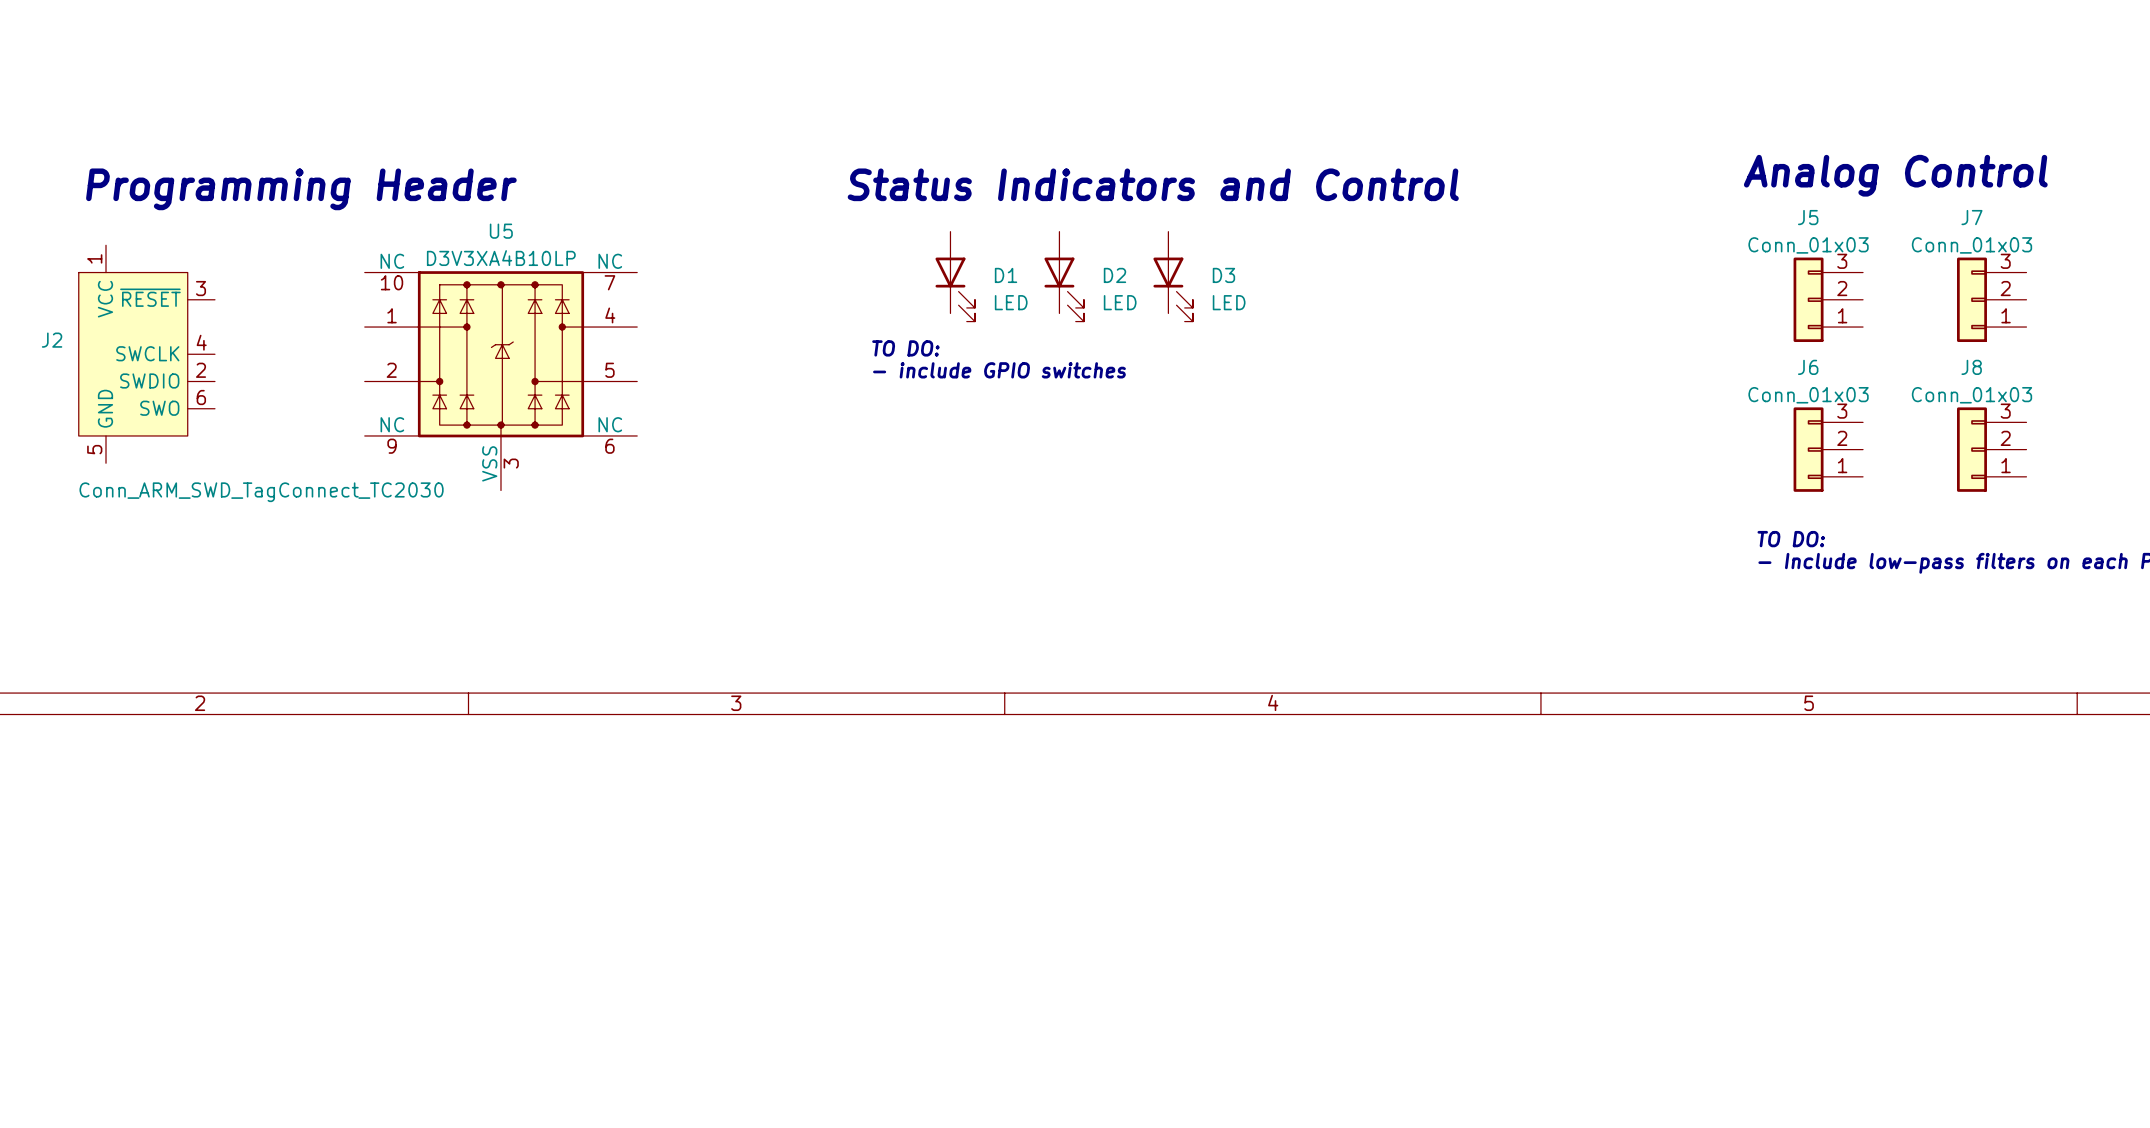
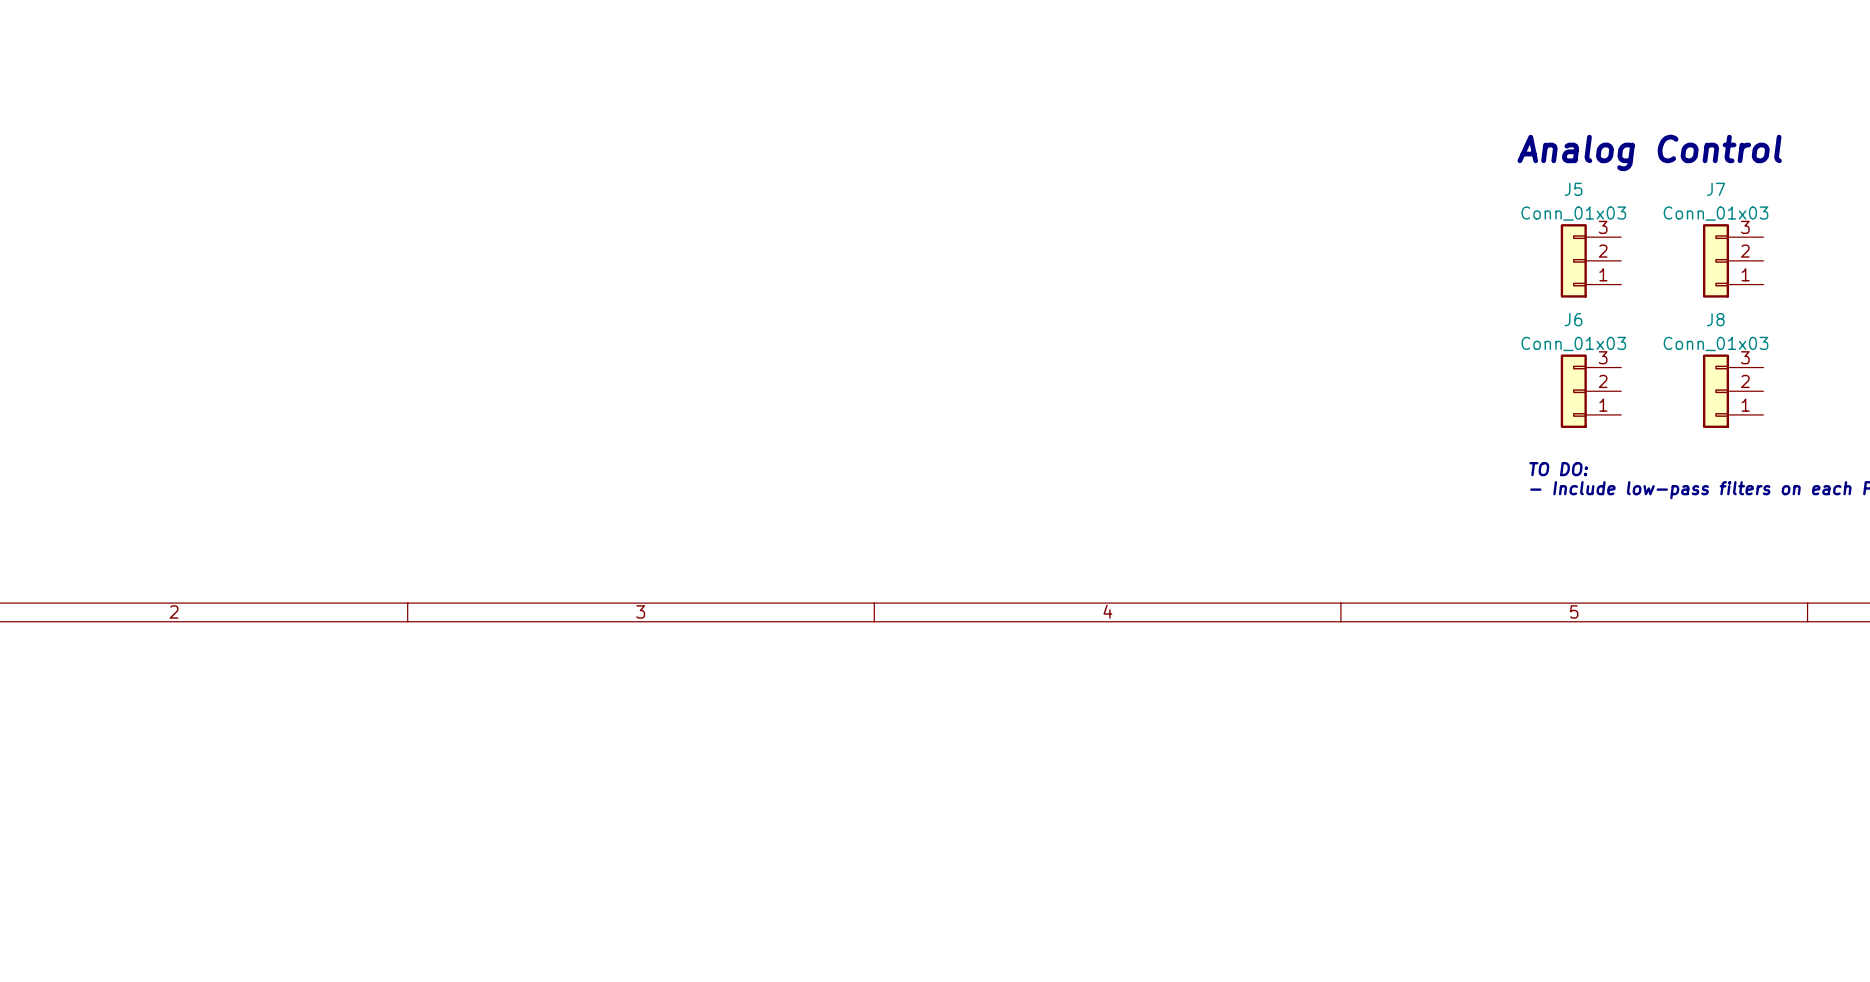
text: Status Indicators and Control (1153, 184) -> none
text: Programming Header (301, 189) -> none
D1: LED (955, 276) -> none
D2: LED (1064, 276) -> none
D3: LED (1173, 276) -> none
text: TO DO: (905, 348) -> none
J2: Conn_ARM_SWD_TagConnect_TC2030 (146, 354) -> none
text: - include GPIO switches (999, 370) -> none
U5: D3V3XA4B10LP (500, 380) -> none

